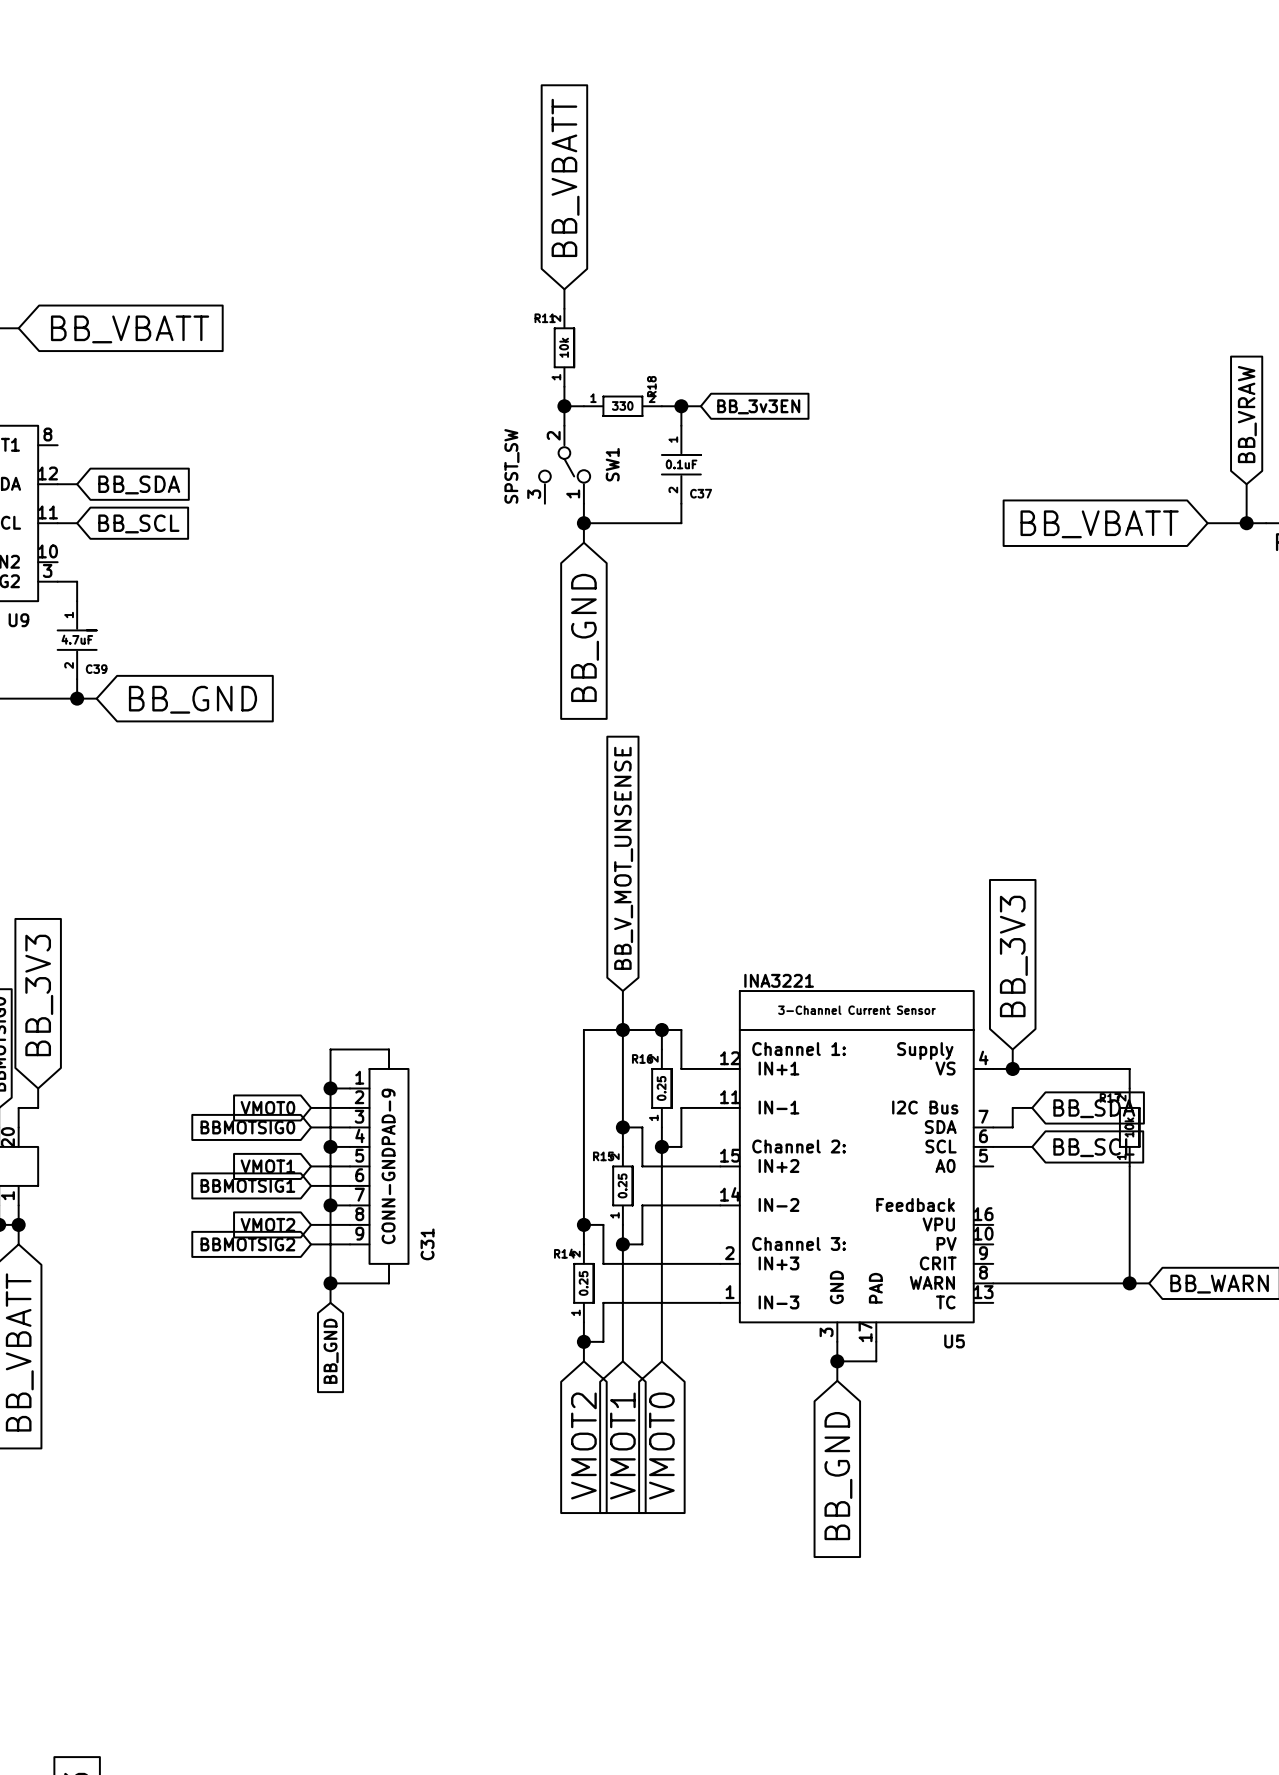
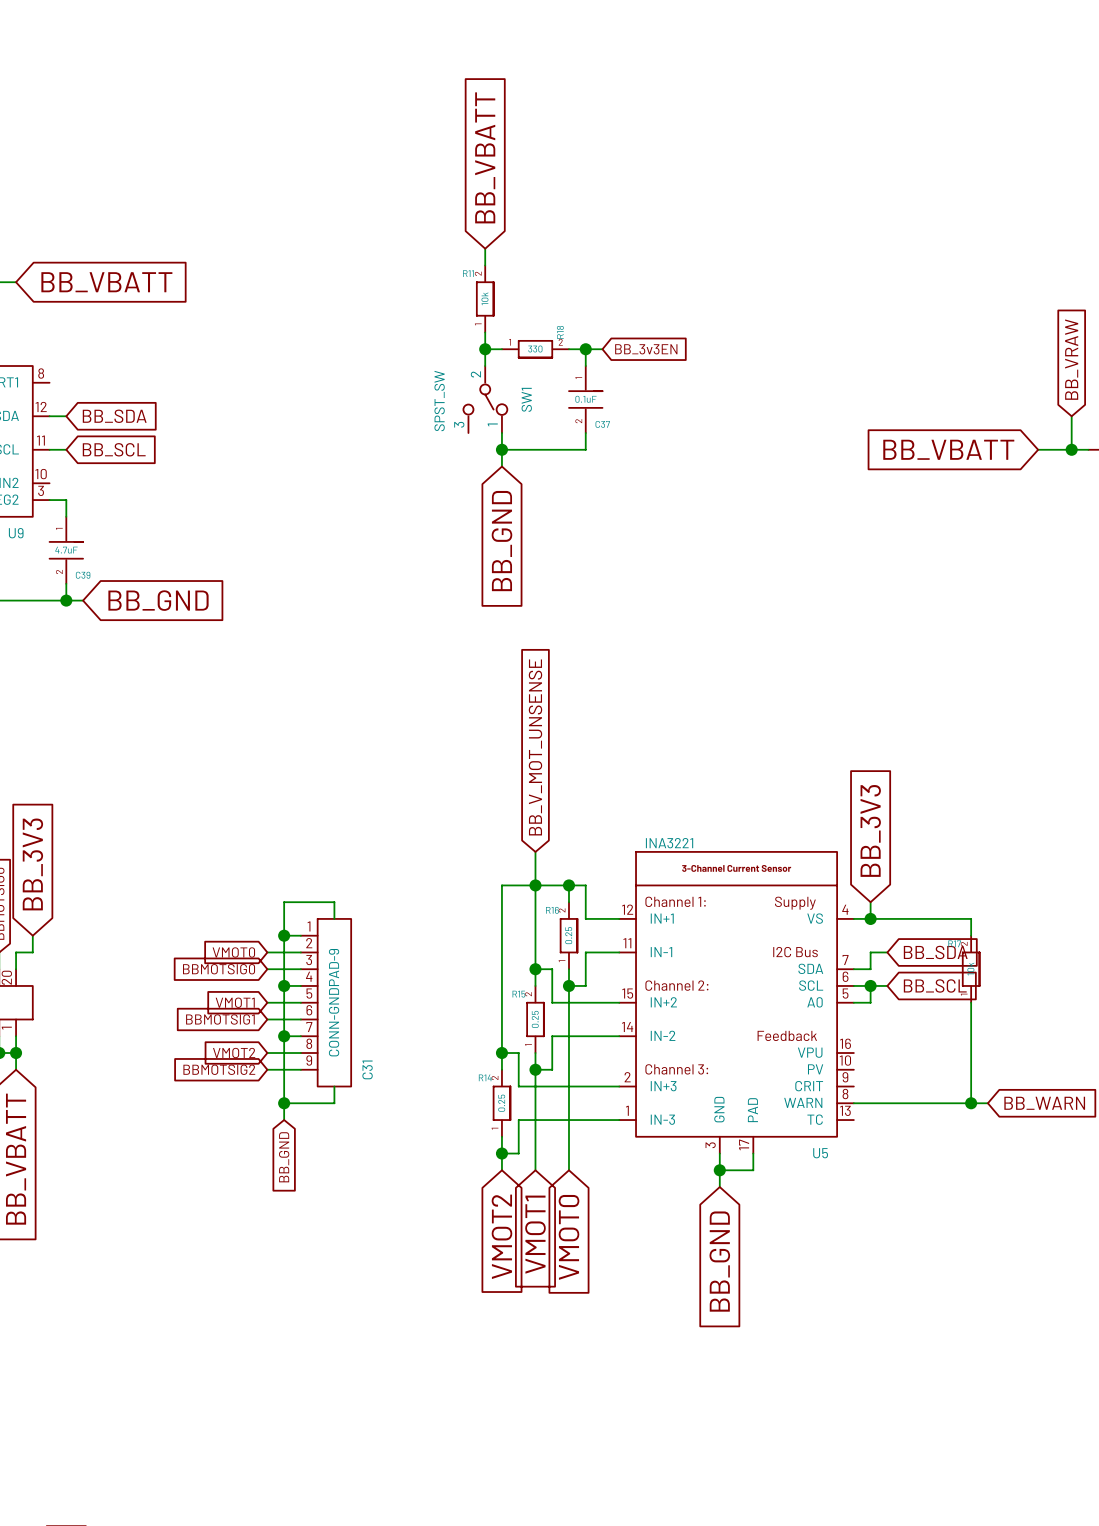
wire: none -> (870, 985) (870, 1002) (853, 1002)
junction: none -> (870, 985)

